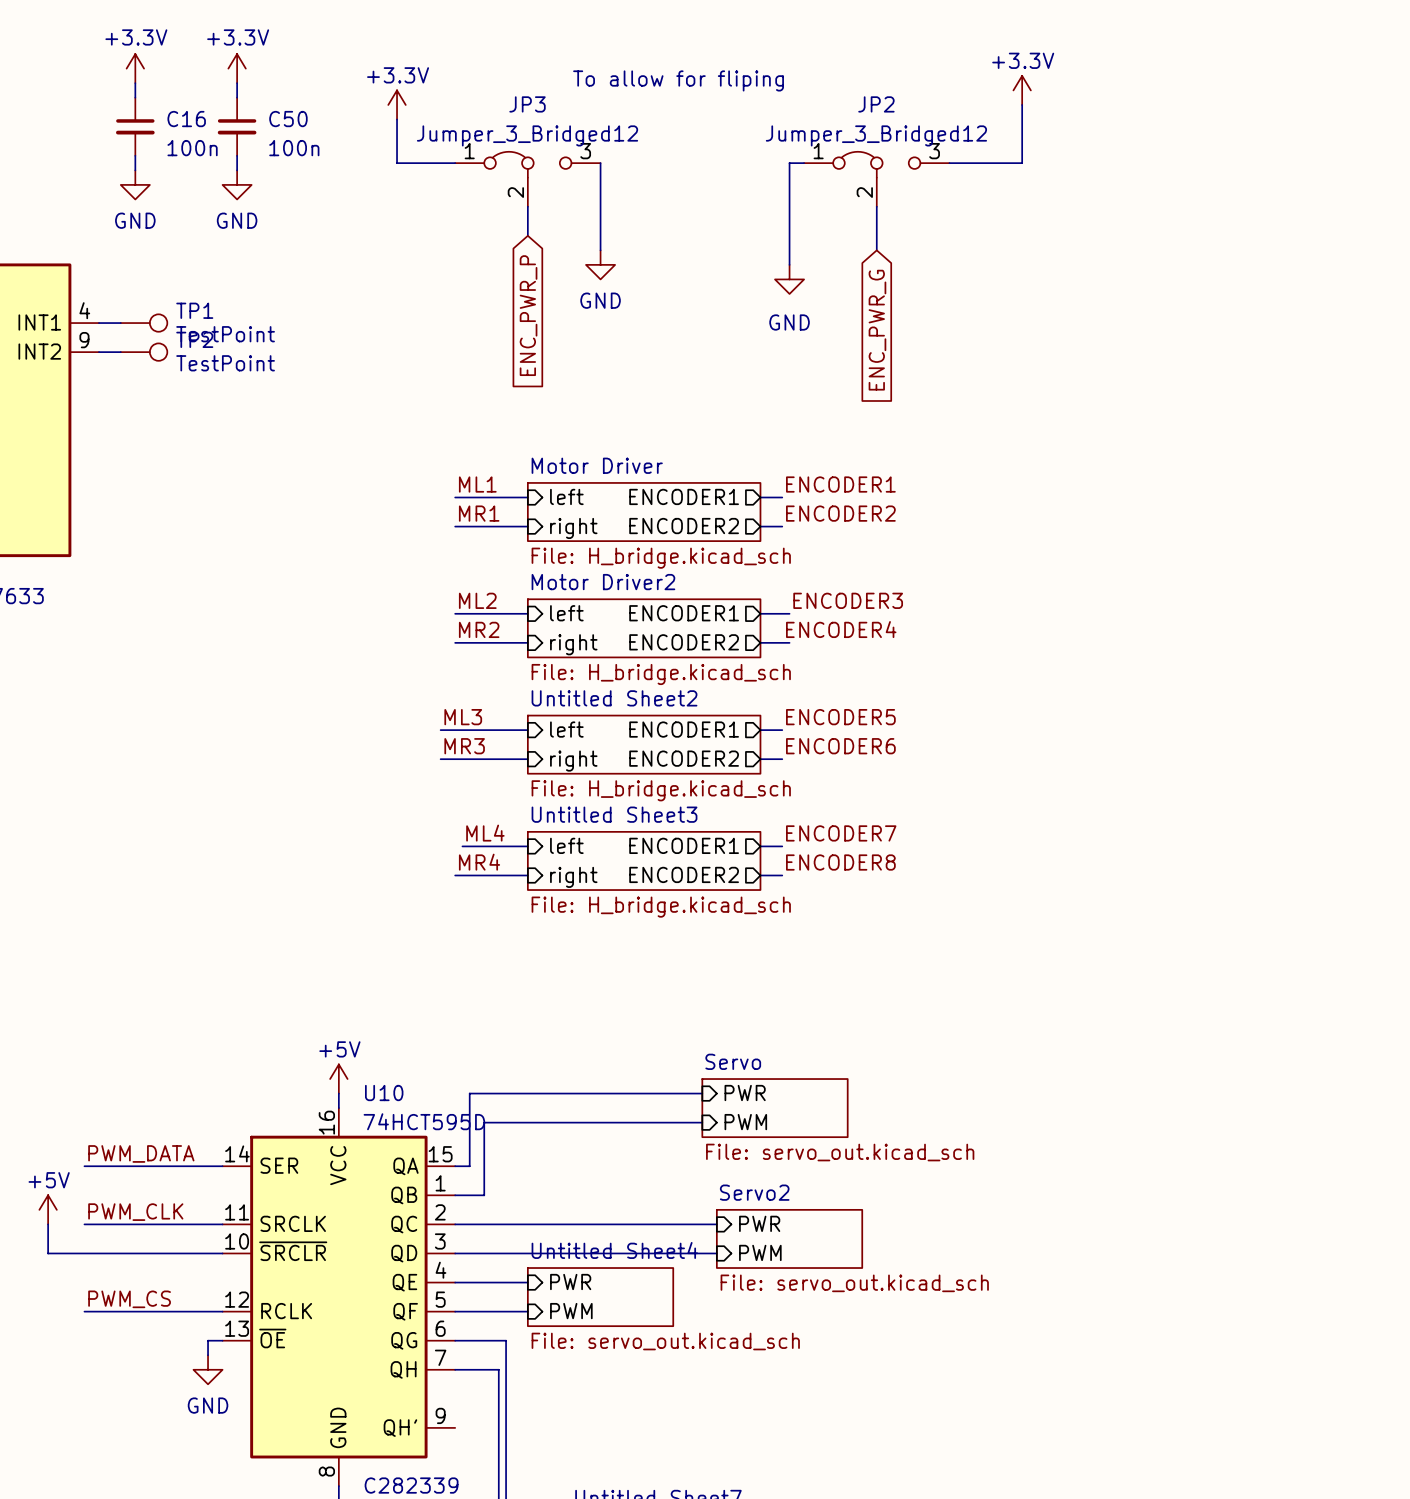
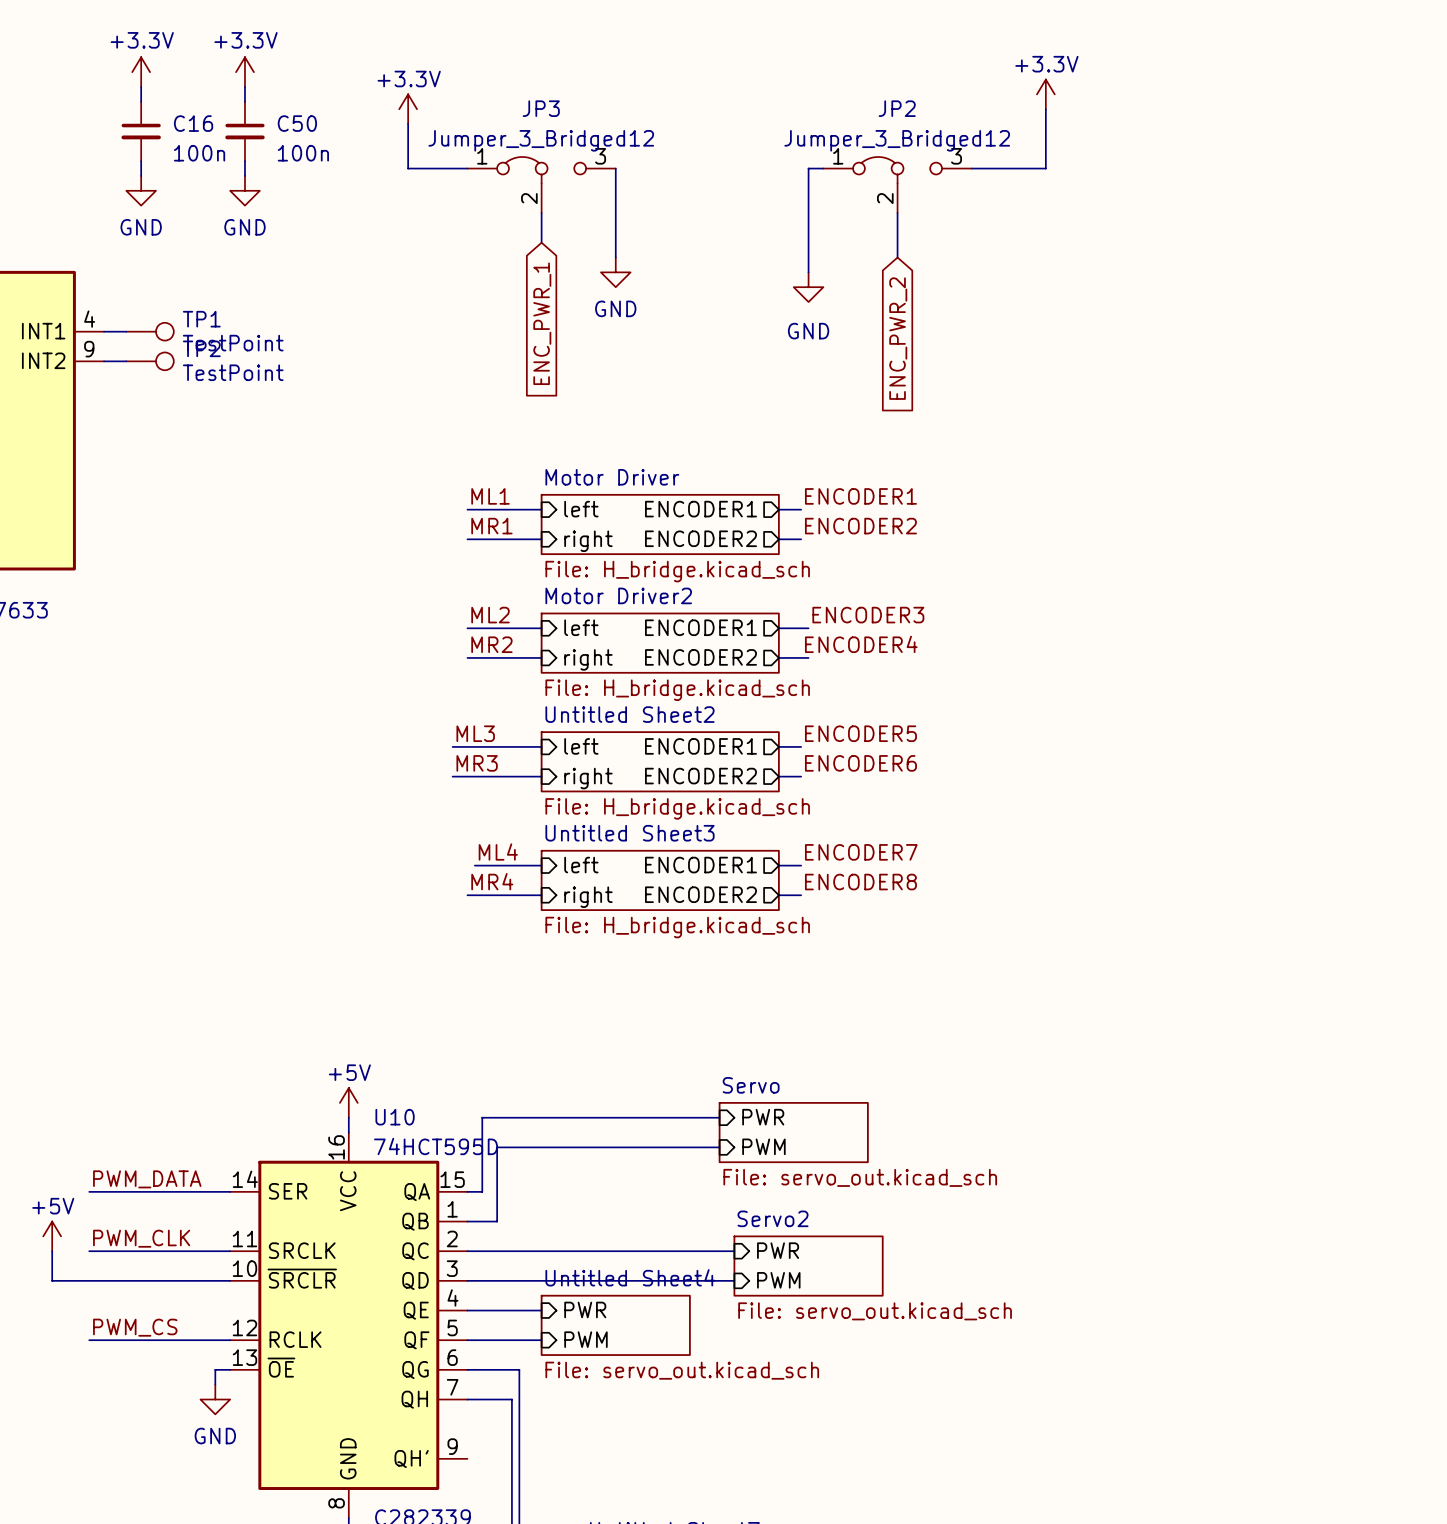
text: To allow for fliping (678, 80) -> none
global label: ENC_PWR_P (528, 315) -> ENC_PWR_1 (542, 323)
global label: ENC_PWR_G (877, 330) -> ENC_PWR_2 (898, 338)

